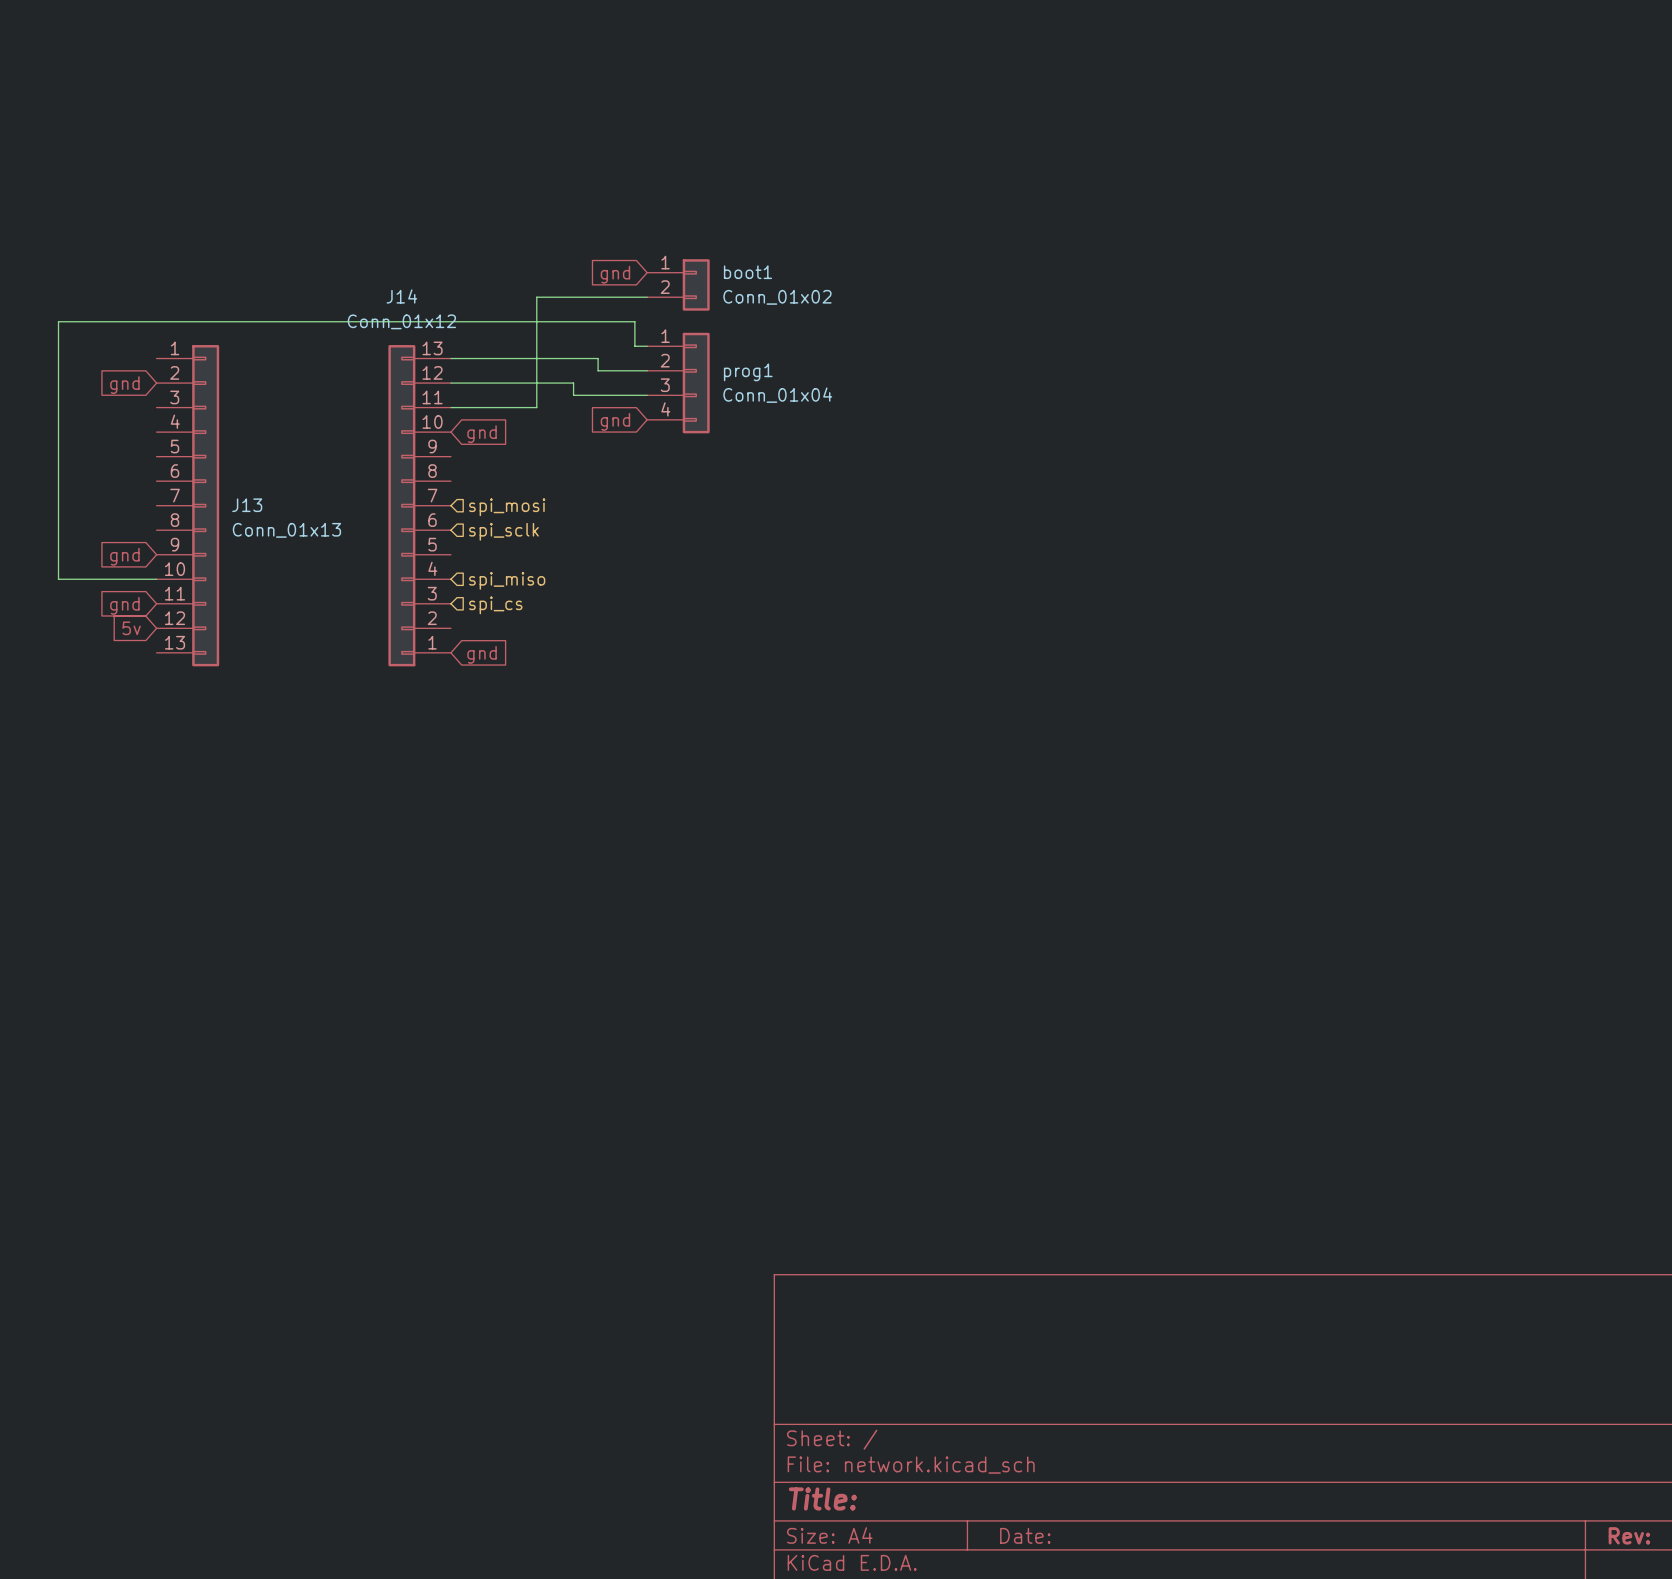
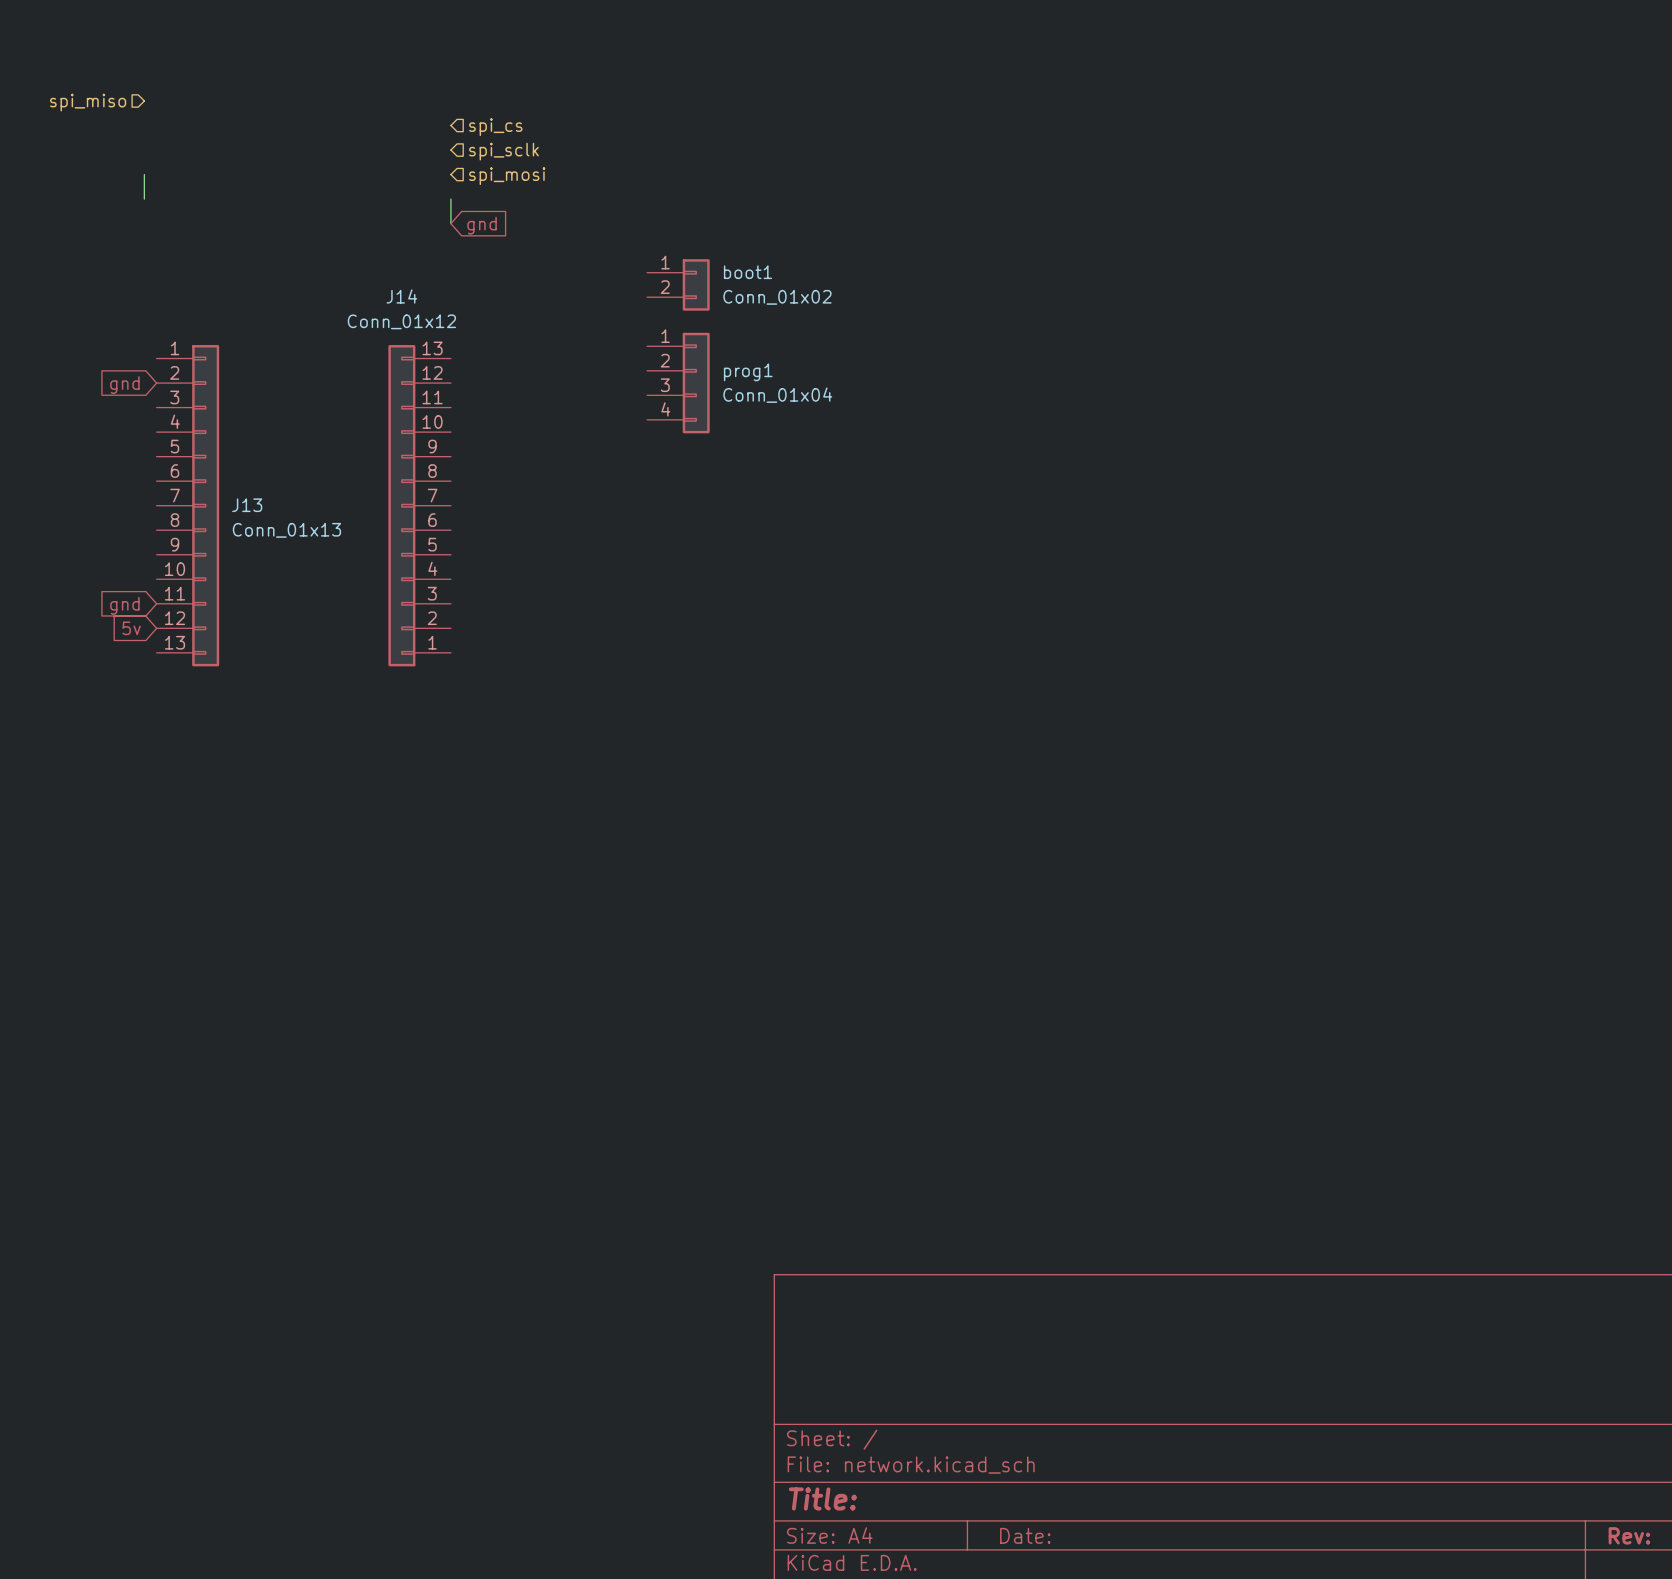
hierarchical label: none -> spi_miso (88, 102)
hierarchical label: none -> spi_cs (495, 127)
hierarchical label: none -> spi_sclk (503, 151)
wire: none -> (144, 174) (144, 199)
hierarchical label: none -> spi_mosi (507, 176)
wire: none -> (450, 199) (450, 223)
global label: none -> gnd (482, 225)
global label: gnd (615, 274) -> none
wire: (647, 297) (536, 297) (536, 407) (450, 407) -> none
wire: (647, 346) (634, 346) (634, 321) (58, 321) (58, 579) (156, 579) -> none
wire: (450, 358) (598, 358) (598, 370) (647, 370) -> none
wire: (450, 383) (573, 383) (573, 395) (647, 395) -> none
global label: gnd (615, 421) -> none
global label: gnd (482, 434) -> none
hierarchical label: spi_mosi (507, 507) -> none
hierarchical label: spi_sclk (503, 531) -> none
global label: gnd (124, 556) -> none
hierarchical label: spi_miso (507, 580) -> none
hierarchical label: spi_cs (495, 605) -> none
global label: gnd (482, 654) -> none

